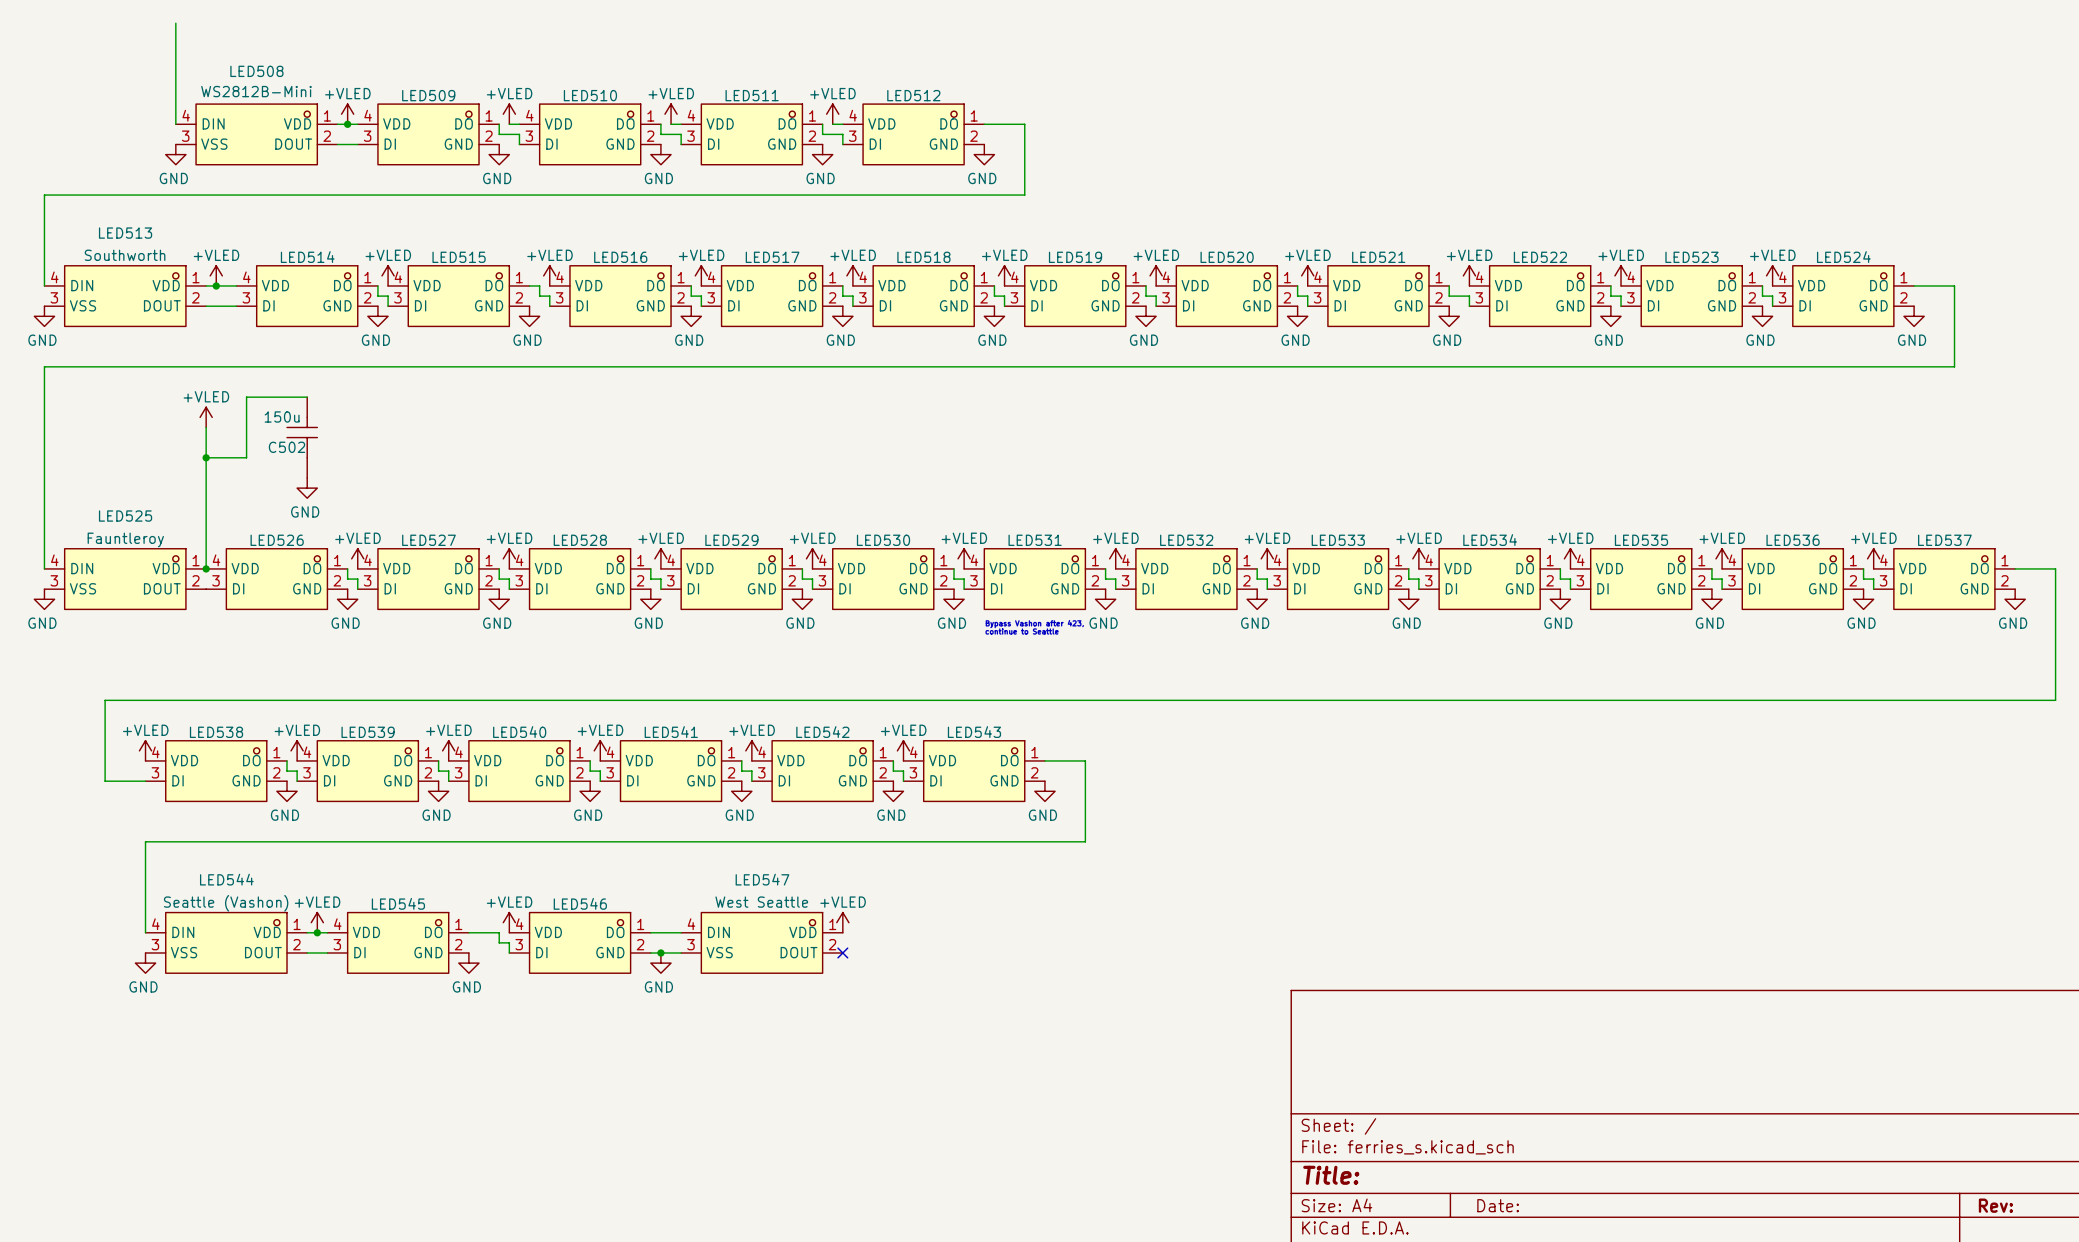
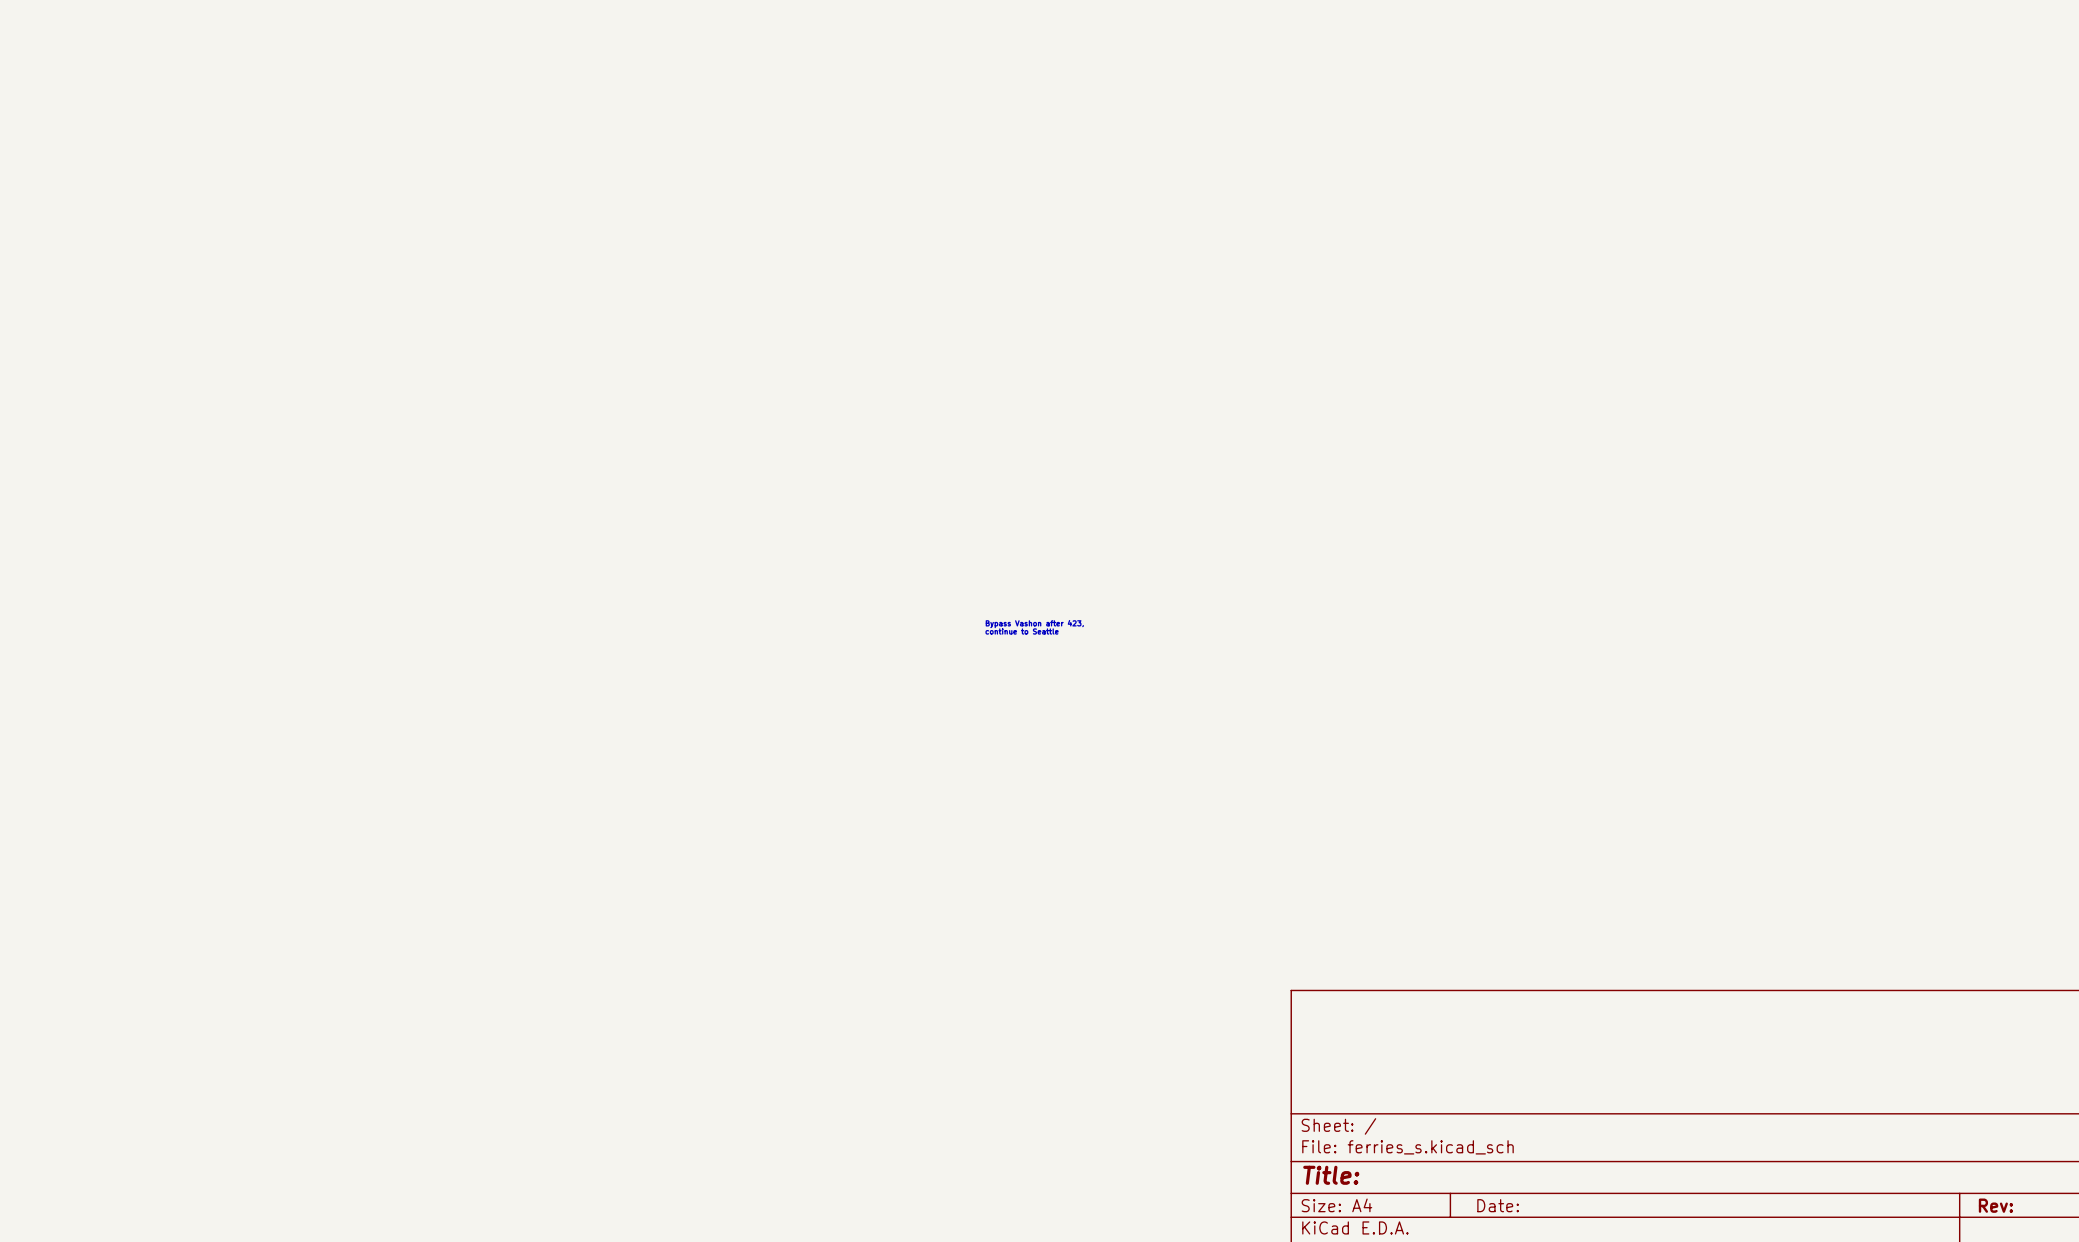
wire: (175, 23) (175, 124) -> none
power symbol: +VLED (347, 114) -> none
power symbol: +VLED (509, 114) -> none
power symbol: +VLED (671, 114) -> none
power symbol: +VLED (832, 114) -> none
wire: (337, 124) (357, 124) -> none
junction: (347, 124) -> none
wire: (499, 124) (499, 134) (519, 134) (519, 144) -> none
wire: (509, 124) (519, 124) -> none
wire: (660, 124) (660, 134) (681, 134) (681, 144) -> none
wire: (671, 124) (681, 124) -> none
wire: (822, 124) (822, 134) (842, 134) (842, 144) -> none
wire: (832, 124) (842, 124) -> none
wire: (984, 124) (1024, 124) (1024, 195) (44, 195) (44, 285) -> none
LED508: WS2812B-Mini (256, 134) -> none
LED509: (428, 134) -> none
LED510: (590, 134) -> none
LED511: (751, 134) -> none
LED512: (913, 134) -> none
wire: (337, 144) (357, 144) -> none
power symbol: GND (175, 154) -> none
power symbol: GND (499, 154) -> none
power symbol: GND (660, 154) -> none
power symbol: GND (822, 154) -> none
power symbol: GND (984, 154) -> none
power symbol: +VLED (216, 275) -> none
power symbol: +VLED (388, 275) -> none
power symbol: +VLED (549, 275) -> none
power symbol: +VLED (701, 275) -> none
power symbol: +VLED (852, 275) -> none
power symbol: +VLED (1004, 275) -> none
power symbol: +VLED (1156, 275) -> none
power symbol: +VLED (1307, 275) -> none
power symbol: +VLED (1469, 275) -> none
power symbol: +VLED (1621, 275) -> none
power symbol: +VLED (1772, 275) -> none
wire: (206, 285) (236, 285) -> none
junction: (216, 285) -> none
wire: (377, 285) (377, 296) (388, 296) (388, 306) -> none
wire: (529, 285) (539, 285) (539, 296) (549, 296) (549, 306) -> none
wire: (691, 285) (691, 296) (701, 296) (701, 306) -> none
wire: (842, 285) (842, 296) (852, 296) (852, 306) -> none
wire: (994, 285) (994, 296) (1004, 296) (1004, 306) -> none
wire: (1146, 285) (1146, 296) (1156, 296) (1156, 306) -> none
wire: (1297, 285) (1297, 296) (1307, 296) (1307, 306) -> none
wire: (1449, 285) (1449, 296) (1469, 296) (1469, 306) -> none
wire: (1610, 285) (1610, 296) (1621, 296) (1621, 306) -> none
wire: (1762, 285) (1762, 296) (1772, 296) (1772, 306) -> none
wire: (1914, 285) (1954, 285) (1954, 366) (44, 366) (44, 568) -> none
LED513: (125, 296) -> none
LED514: (307, 296) -> none
LED515: (458, 296) -> none
LED516: (620, 296) -> none
LED517: (772, 296) -> none
LED518: (923, 296) -> none
LED519: (1075, 296) -> none
LED520: (1226, 296) -> none
LED521: (1378, 296) -> none
LED522: (1540, 296) -> none
LED523: (1691, 296) -> none
LED524: (1843, 296) -> none
wire: (206, 306) (236, 306) -> none
power symbol: GND (44, 316) -> none
power symbol: GND (377, 316) -> none
power symbol: GND (529, 316) -> none
power symbol: GND (691, 316) -> none
power symbol: GND (842, 316) -> none
power symbol: GND (994, 316) -> none
power symbol: GND (1146, 316) -> none
power symbol: GND (1297, 316) -> none
power symbol: GND (1449, 316) -> none
power symbol: GND (1610, 316) -> none
power symbol: GND (1762, 316) -> none
power symbol: GND (1914, 316) -> none
wire: (307, 397) (246, 397) (246, 457) (206, 457) -> none
power symbol: +VLED (206, 417) -> none
wire: (206, 427) (206, 568) -> none
C502: 150u (302, 437) -> none
junction: (206, 457) -> none
power symbol: GND (307, 488) -> none
power symbol: +VLED (357, 558) -> none
power symbol: +VLED (509, 558) -> none
power symbol: +VLED (660, 558) -> none
power symbol: +VLED (812, 558) -> none
power symbol: +VLED (964, 558) -> none
power symbol: +VLED (1115, 558) -> none
power symbol: +VLED (1267, 558) -> none
power symbol: +VLED (1418, 558) -> none
power symbol: +VLED (1570, 558) -> none
power symbol: +VLED (1722, 558) -> none
power symbol: +VLED (1873, 558) -> none
junction: (206, 568) -> none
wire: (347, 568) (347, 579) (357, 579) (357, 589) -> none
wire: (499, 568) (499, 579) (509, 579) (509, 589) -> none
wire: (650, 568) (650, 579) (660, 579) (660, 589) -> none
wire: (802, 568) (802, 579) (812, 579) (812, 589) -> none
wire: (954, 568) (954, 579) (964, 579) (964, 589) -> none
wire: (1105, 568) (1105, 579) (1115, 579) (1115, 589) -> none
wire: (1257, 568) (1257, 579) (1267, 579) (1267, 589) -> none
wire: (1408, 568) (1408, 579) (1418, 579) (1418, 589) -> none
wire: (1560, 568) (1560, 579) (1570, 579) (1570, 589) -> none
wire: (1711, 568) (1711, 579) (1722, 579) (1722, 589) -> none
wire: (1863, 568) (1863, 579) (1873, 579) (1873, 589) -> none
wire: (2015, 568) (2055, 568) (2055, 700) (105, 700) (105, 781) (145, 781) -> none
LED525: (125, 579) -> none
LED526: (276, 579) -> none
LED527: (428, 579) -> none
LED528: (580, 579) -> none
LED529: (731, 579) -> none
LED530: (883, 579) -> none
LED531: (1034, 579) -> none
LED532: (1186, 579) -> none
LED533: (1338, 579) -> none
LED534: (1489, 579) -> none
LED535: (1641, 579) -> none
LED536: (1792, 579) -> none
LED537: (1944, 579) -> none
power symbol: GND (44, 599) -> none
power symbol: GND (347, 599) -> none
power symbol: GND (499, 599) -> none
power symbol: GND (650, 599) -> none
power symbol: GND (802, 599) -> none
power symbol: GND (954, 599) -> none
power symbol: GND (1105, 599) -> none
power symbol: GND (1257, 599) -> none
power symbol: GND (1408, 599) -> none
power symbol: GND (1560, 599) -> none
power symbol: GND (1711, 599) -> none
power symbol: GND (1863, 599) -> none
power symbol: GND (2015, 599) -> none
power symbol: +VLED (145, 750) -> none
power symbol: +VLED (297, 750) -> none
power symbol: +VLED (448, 750) -> none
power symbol: +VLED (600, 750) -> none
power symbol: +VLED (751, 750) -> none
power symbol: +VLED (903, 750) -> none
wire: (287, 760) (287, 771) (297, 771) (297, 781) -> none
wire: (438, 760) (438, 771) (448, 771) (448, 781) -> none
wire: (590, 760) (590, 771) (600, 771) (600, 781) -> none
wire: (741, 760) (741, 771) (751, 771) (751, 781) -> none
wire: (893, 760) (893, 771) (903, 771) (903, 781) -> none
wire: (1044, 760) (1085, 760) (1085, 841) (145, 841) (145, 932) -> none
LED538: (216, 771) -> none
LED539: (367, 771) -> none
LED540: (519, 771) -> none
LED541: (671, 771) -> none
LED542: (822, 771) -> none
LED543: (974, 771) -> none
power symbol: GND (287, 791) -> none
power symbol: GND (438, 791) -> none
power symbol: GND (590, 791) -> none
power symbol: GND (741, 791) -> none
power symbol: GND (893, 791) -> none
power symbol: GND (1044, 791) -> none
power symbol: +VLED (317, 922) -> none
power symbol: +VLED (509, 922) -> none
power symbol: +VLED (842, 922) -> none
wire: (307, 932) (327, 932) -> none
junction: (317, 932) -> none
wire: (468, 932) (499, 932) (499, 942) (509, 942) (509, 952) -> none
wire: (650, 932) (681, 932) -> none
LED544: (226, 942) -> none
LED545: (398, 942) -> none
LED546: (580, 942) -> none
LED547: (761, 942) -> none
wire: (307, 952) (327, 952) -> none
wire: (650, 952) (681, 952) -> none
junction: (660, 952) -> none
no-connect mark: (842, 952) -> none
power symbol: GND (145, 963) -> none
power symbol: GND (468, 963) -> none
power symbol: GND (660, 963) -> none

